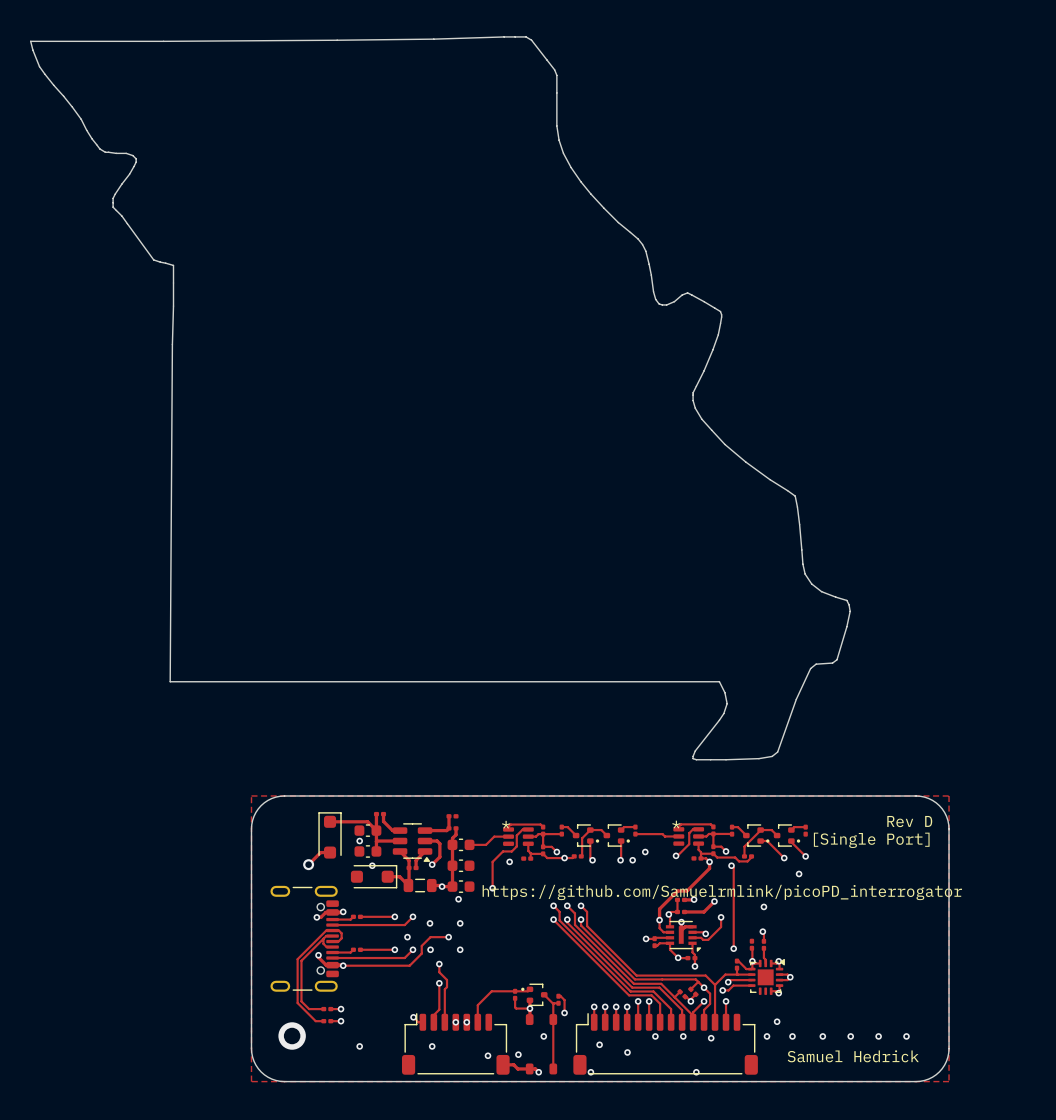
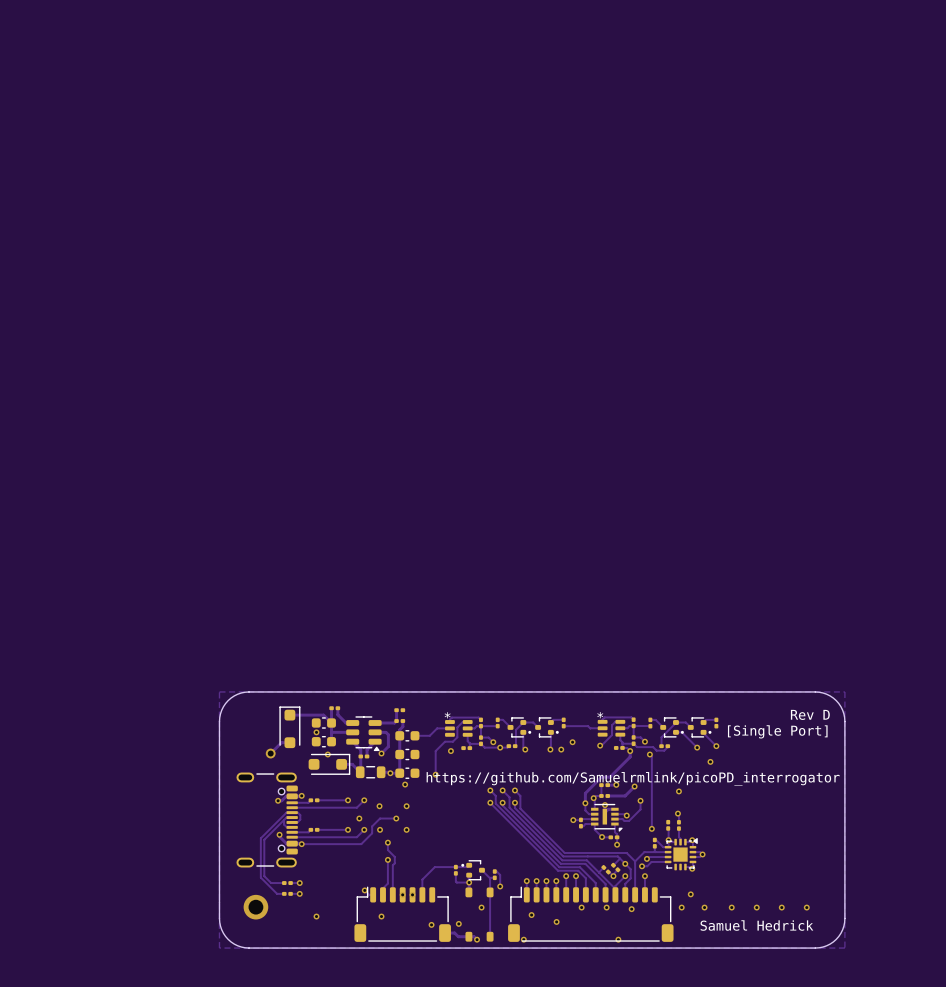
board edge: (504, 36) (337, 40) (30, 41) (39, 66) (72, 107) (99, 148) (105, 152) (126, 153) (136, 158) (129, 174) (113, 198) (113, 207) (121, 215) (153, 259) (173, 265) (170, 681) (719, 681) (724, 692) (727, 703) (723, 713) (695, 750) (693, 758) (726, 759) (772, 756) (777, 752) (796, 699) (810, 668) (816, 664) (832, 663) (836, 659) (846, 626) (850, 611) (849, 604) (846, 600) (821, 591) (811, 583) (805, 574) (795, 496) (745, 462) (724, 444) (701, 419) (695, 408) (693, 392) (718, 334) (721, 317) (720, 311) (687, 292) (666, 304) (659, 303) (653, 291) (649, 264) (642, 244) (590, 194) (571, 167) (563, 153) (556, 125) (556, 75) (554, 69) (531, 40) (526, 36) (504, 36) -> none

